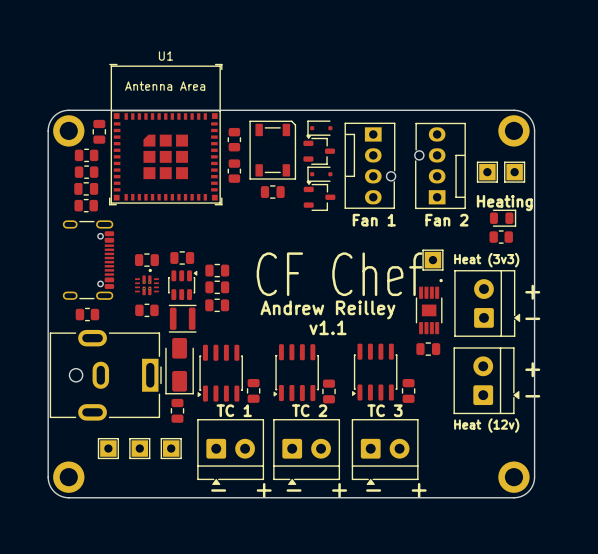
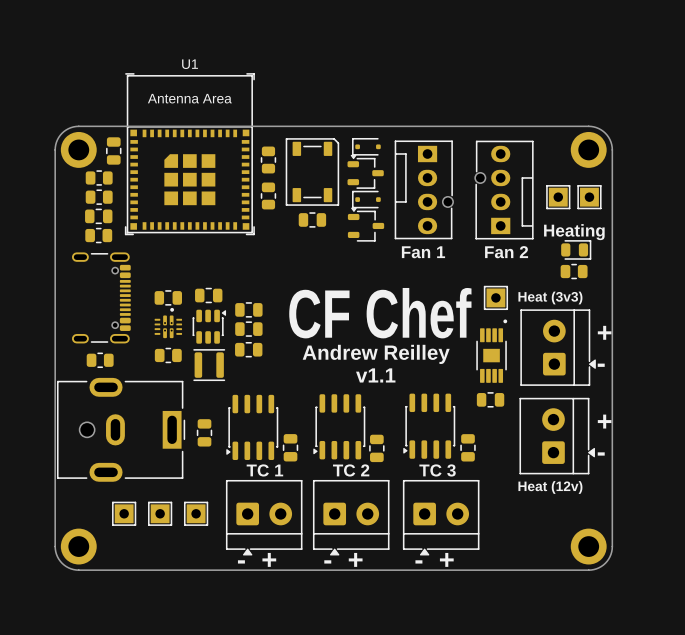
part: (179, 366) -> none
part position: (177, 410) -> (204, 432)

